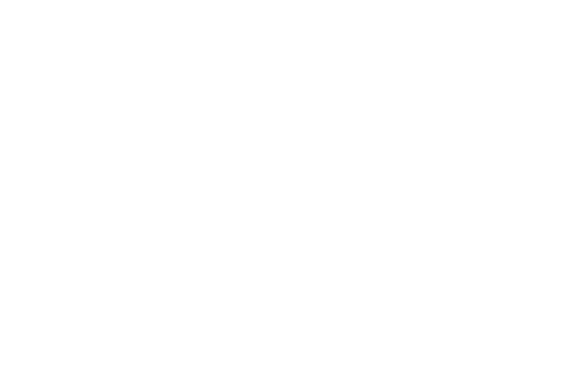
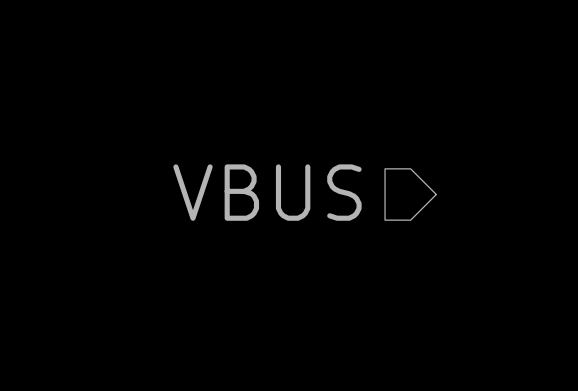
hierarchical label: none -> VBUS (267, 192)

